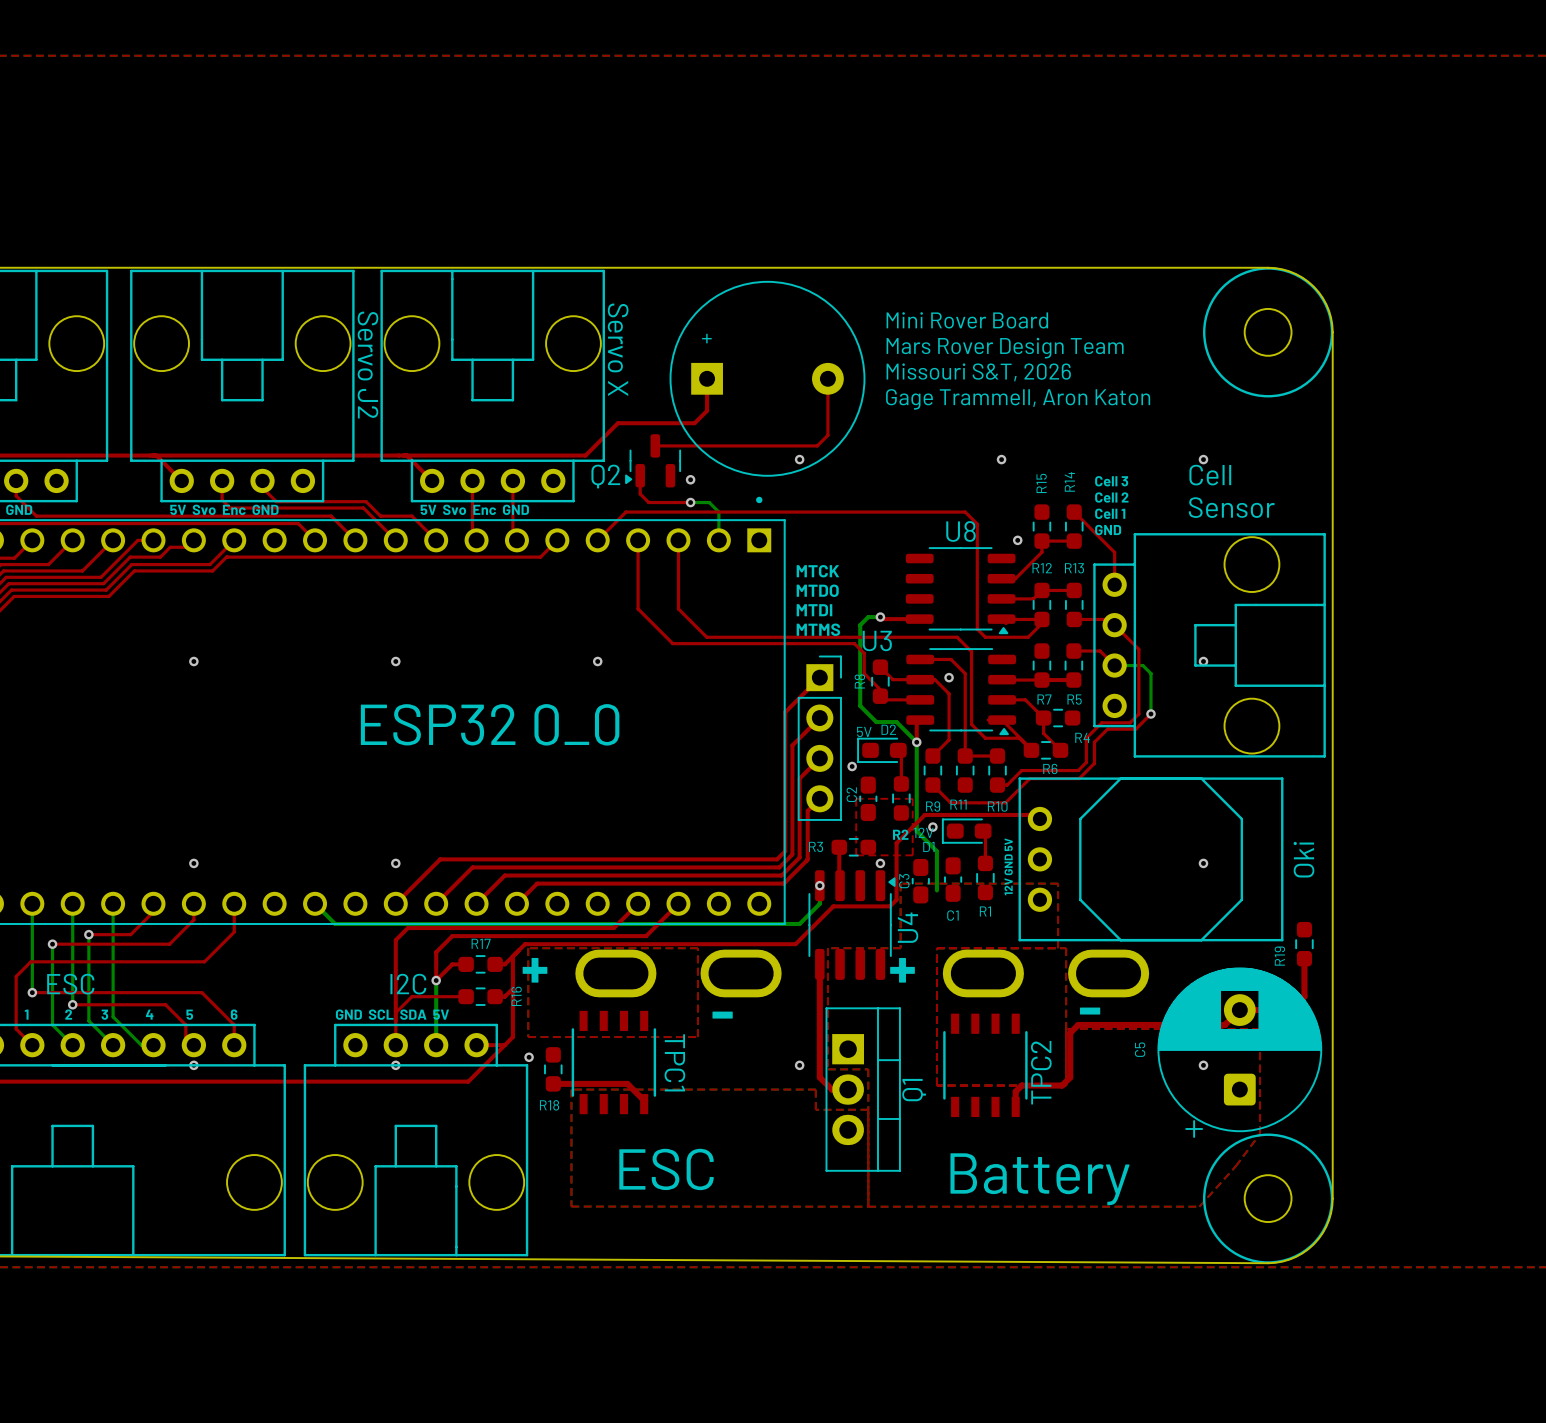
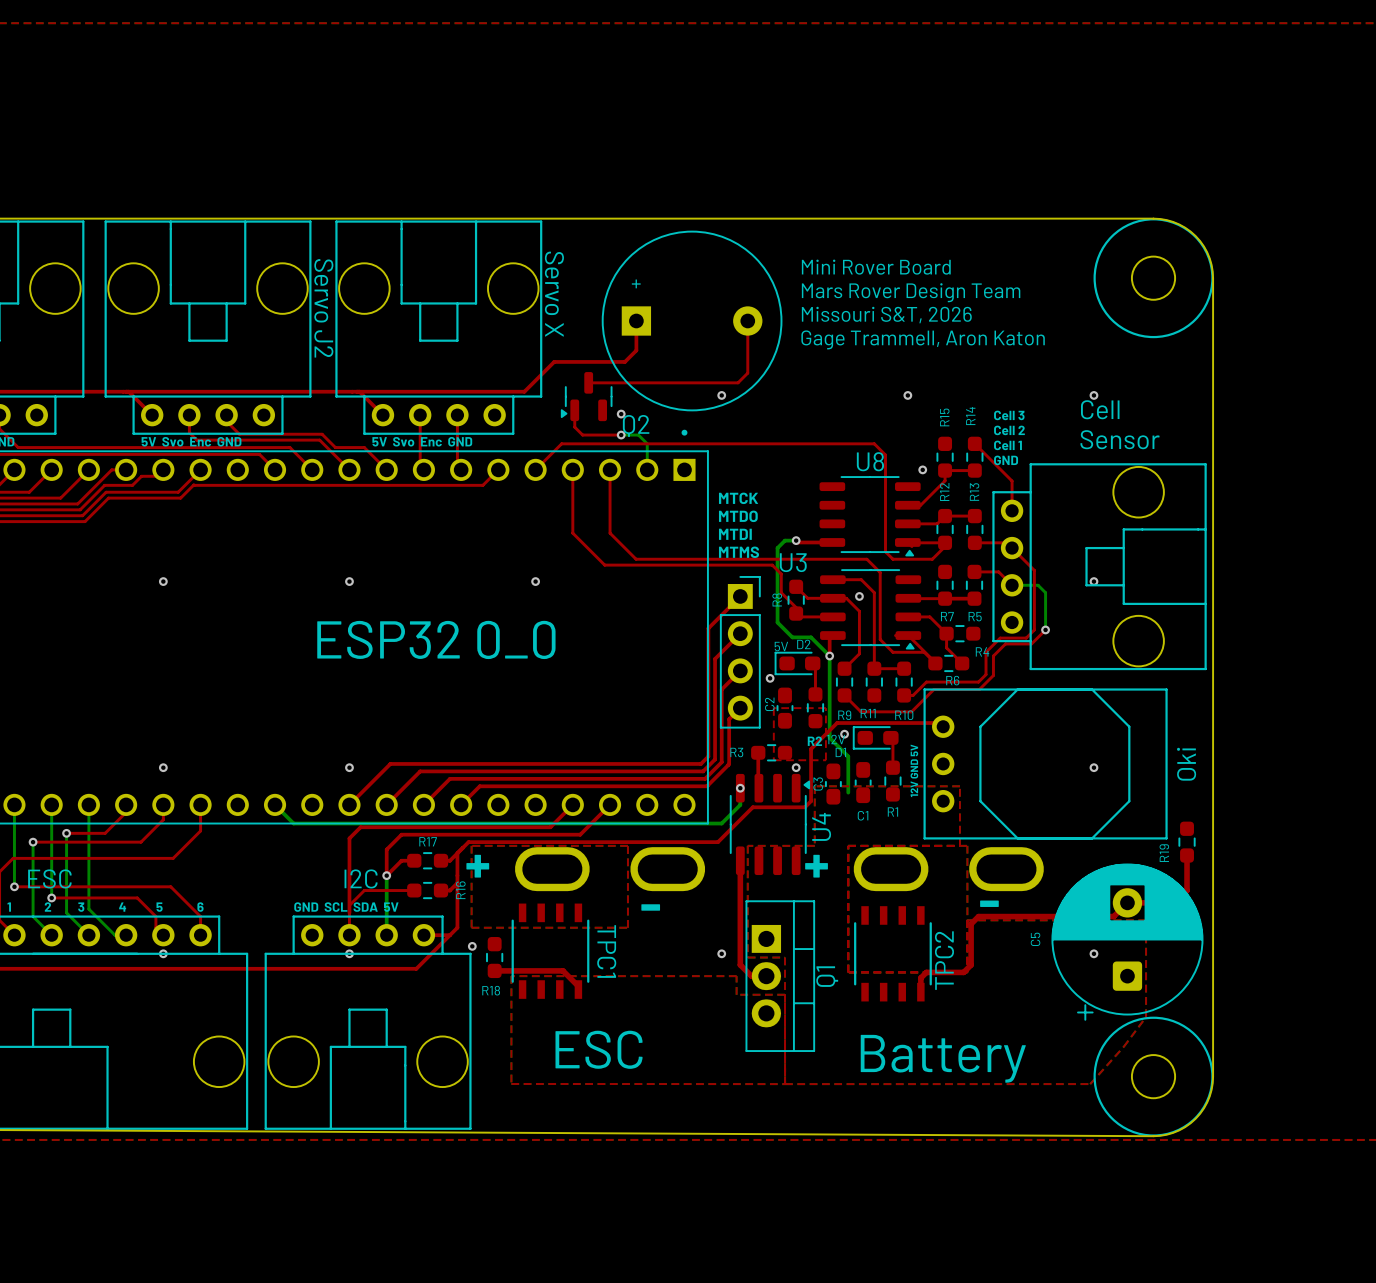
Q2 name position: Q2 (605, 476) -> Q2 (636, 425)
R12 name rotation: 0° (1042, 568) -> 90° counterclockwise (944, 491)
R13 name rotation: 0° (1074, 568) -> 90° counterclockwise (974, 492)

